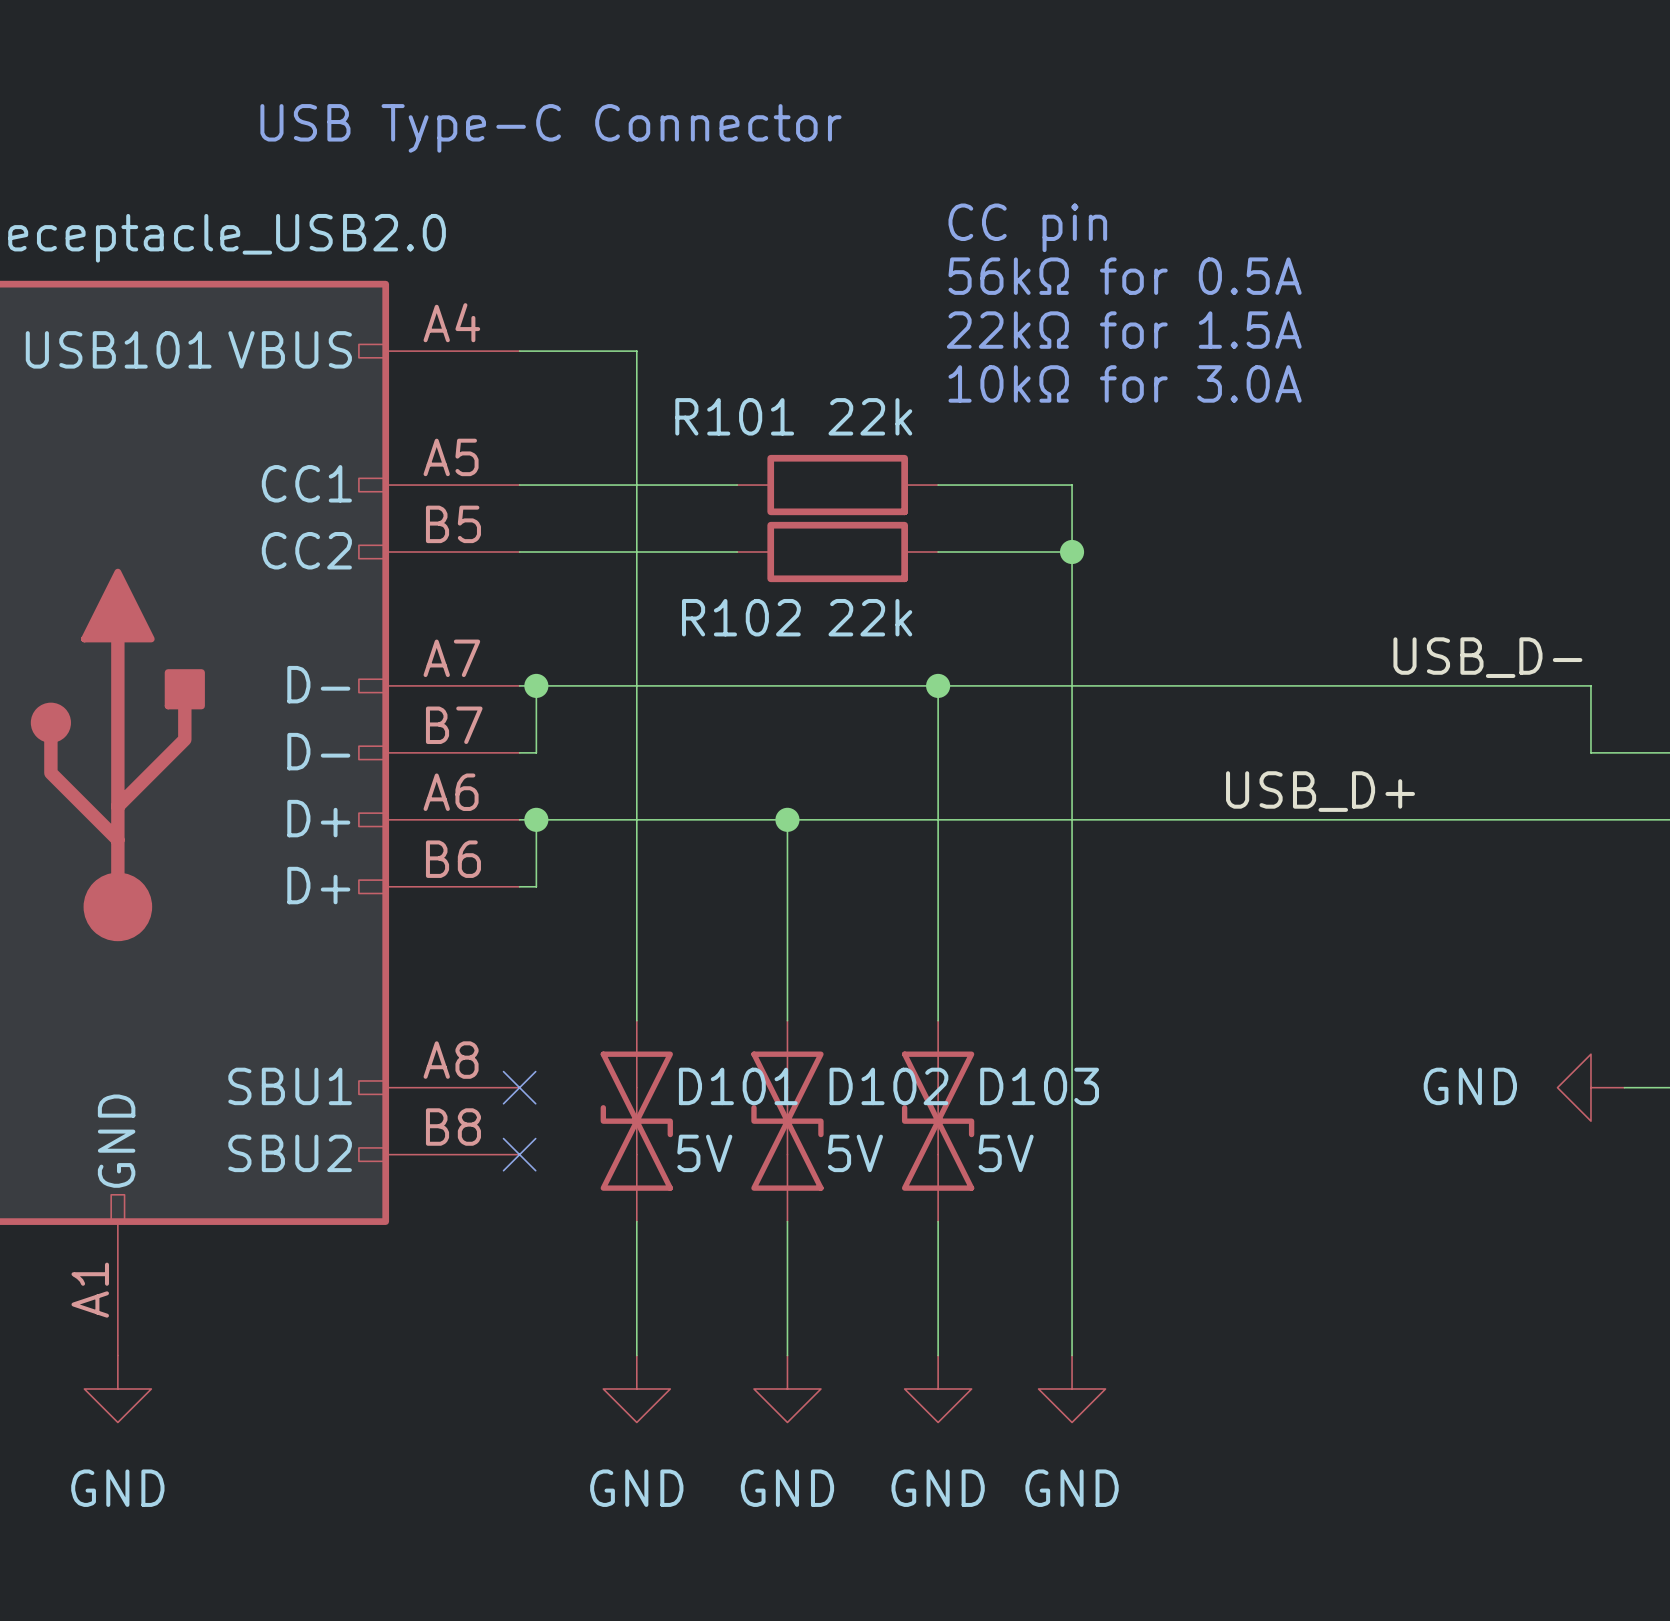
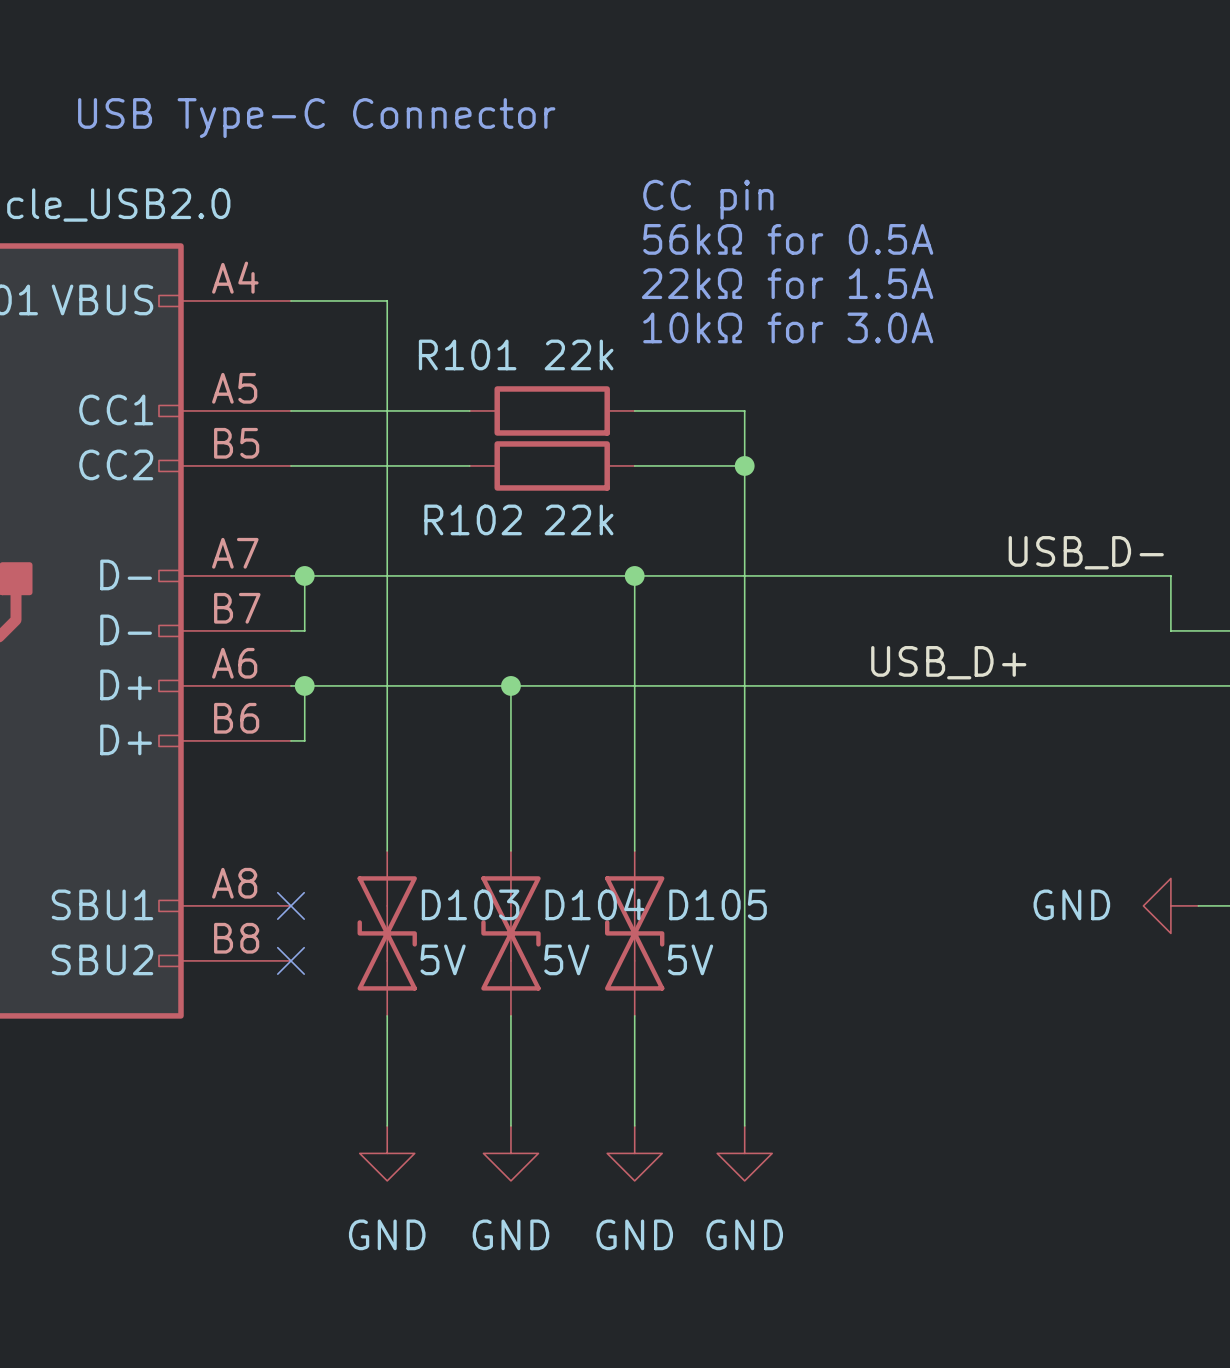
D101 name: D101 (738, 1086) -> D103 (470, 904)
D102 name: D102 (888, 1086) -> D104 (594, 904)
D103 name: D103 (1039, 1086) -> D105 (718, 904)

